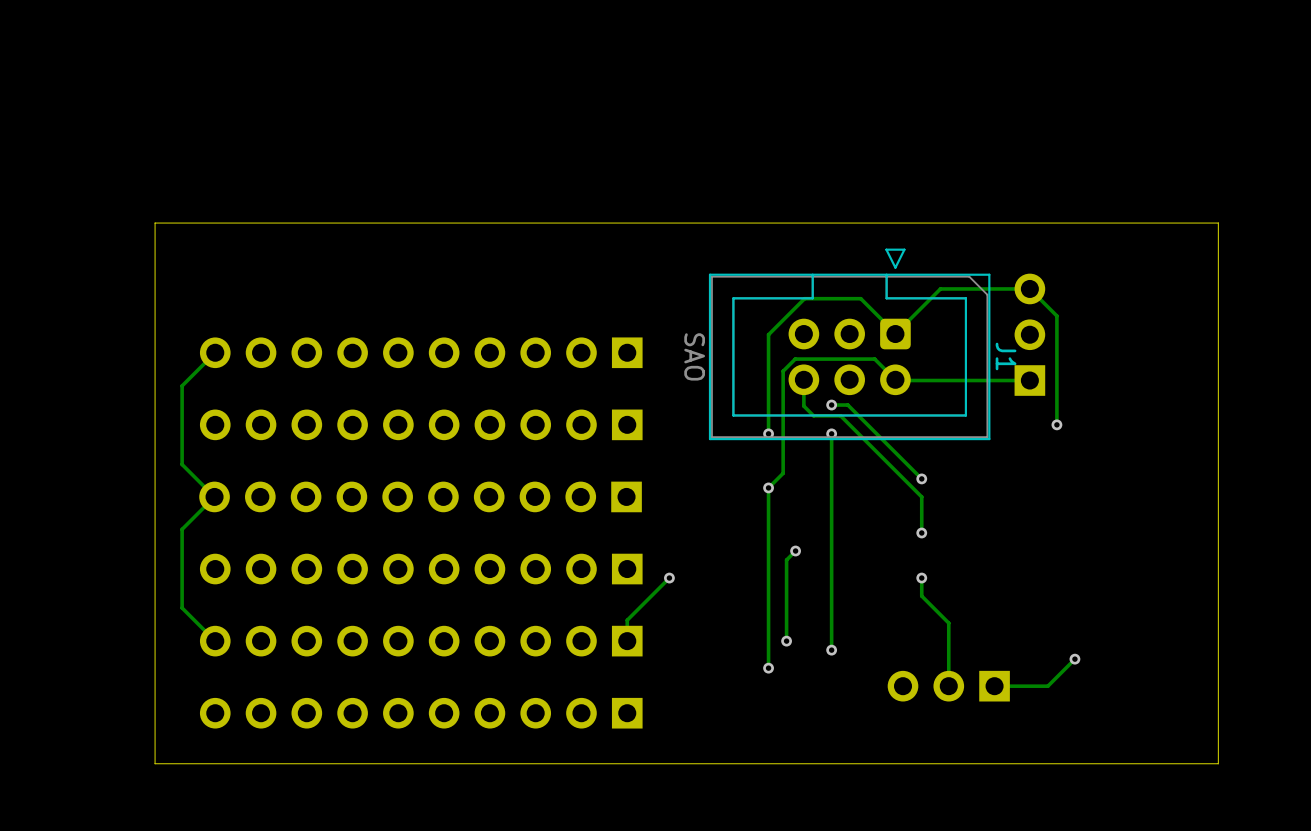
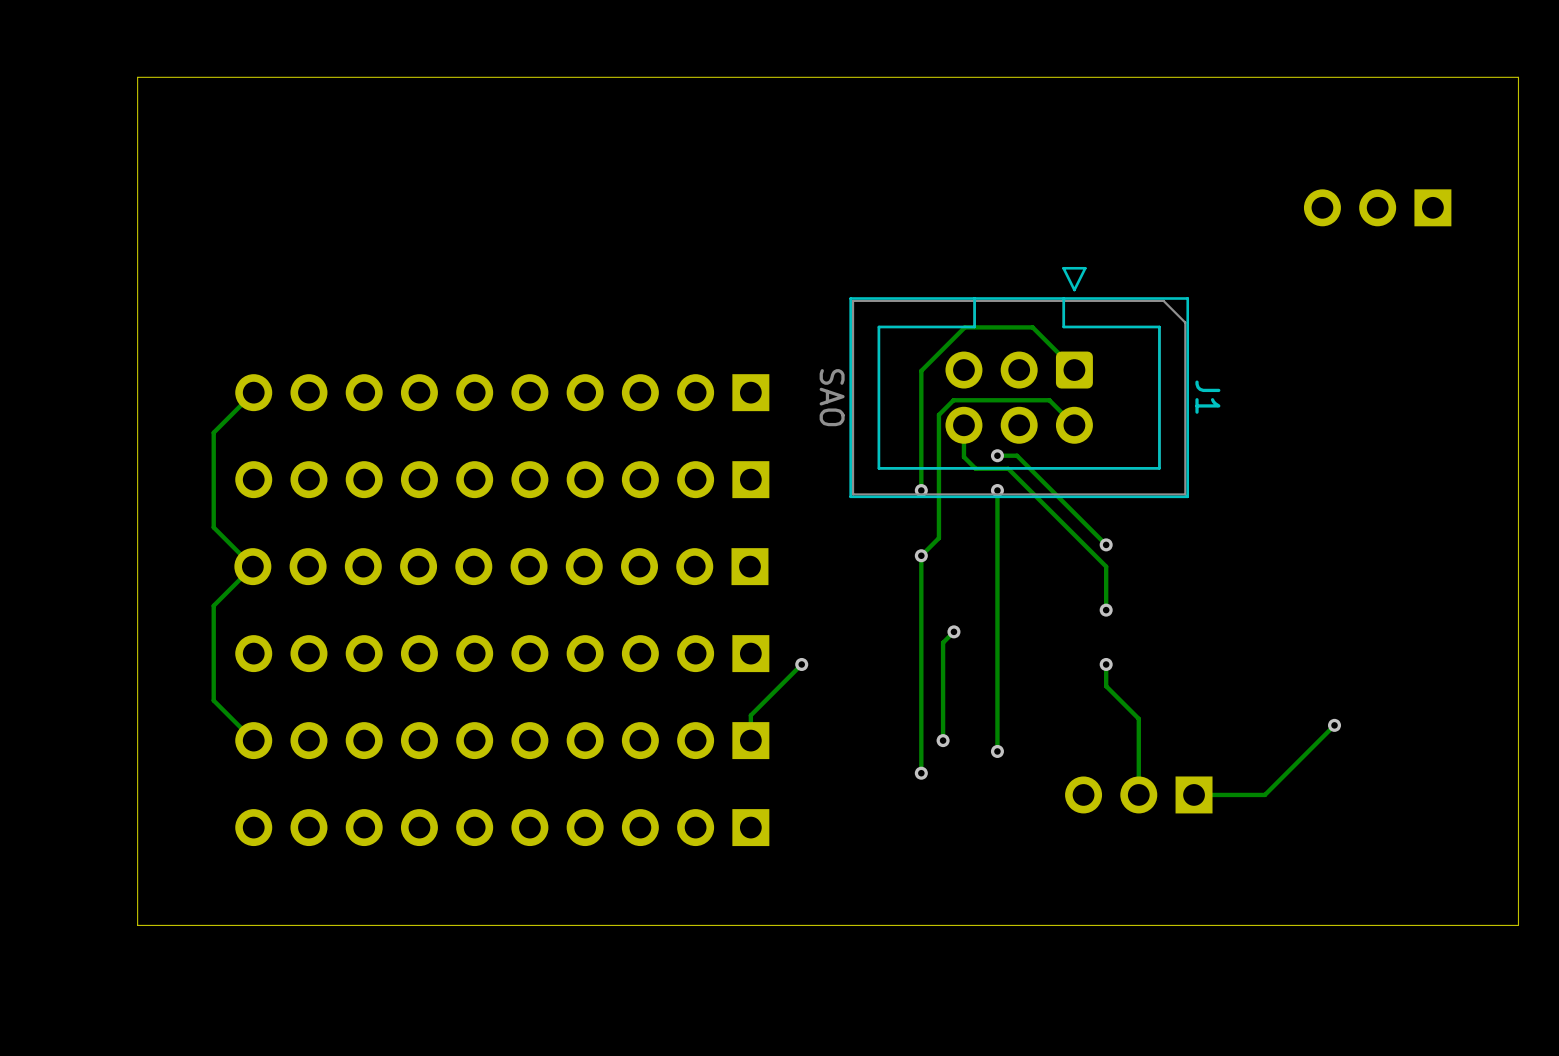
board edge: (1218, 223) (155, 223) (155, 763) (1218, 763) (1218, 223) -> (1518, 77) (1518, 925) (137, 925) (137, 77) (1518, 77)
track: (895, 334) (940, 288) (1029, 288) (1056, 316) (1056, 424) -> none
part rotation: 0° (1029, 334) -> 90° counterclockwise (1377, 207)
part position: (1029, 334) -> (1377, 207)
track: (895, 379) (1029, 380) -> none
via: (1056, 424) -> none
track: (1074, 659) (1047, 686) -> (1334, 725) (1264, 794) (1258, 794)
via position: (1074, 659) -> (1334, 725)

